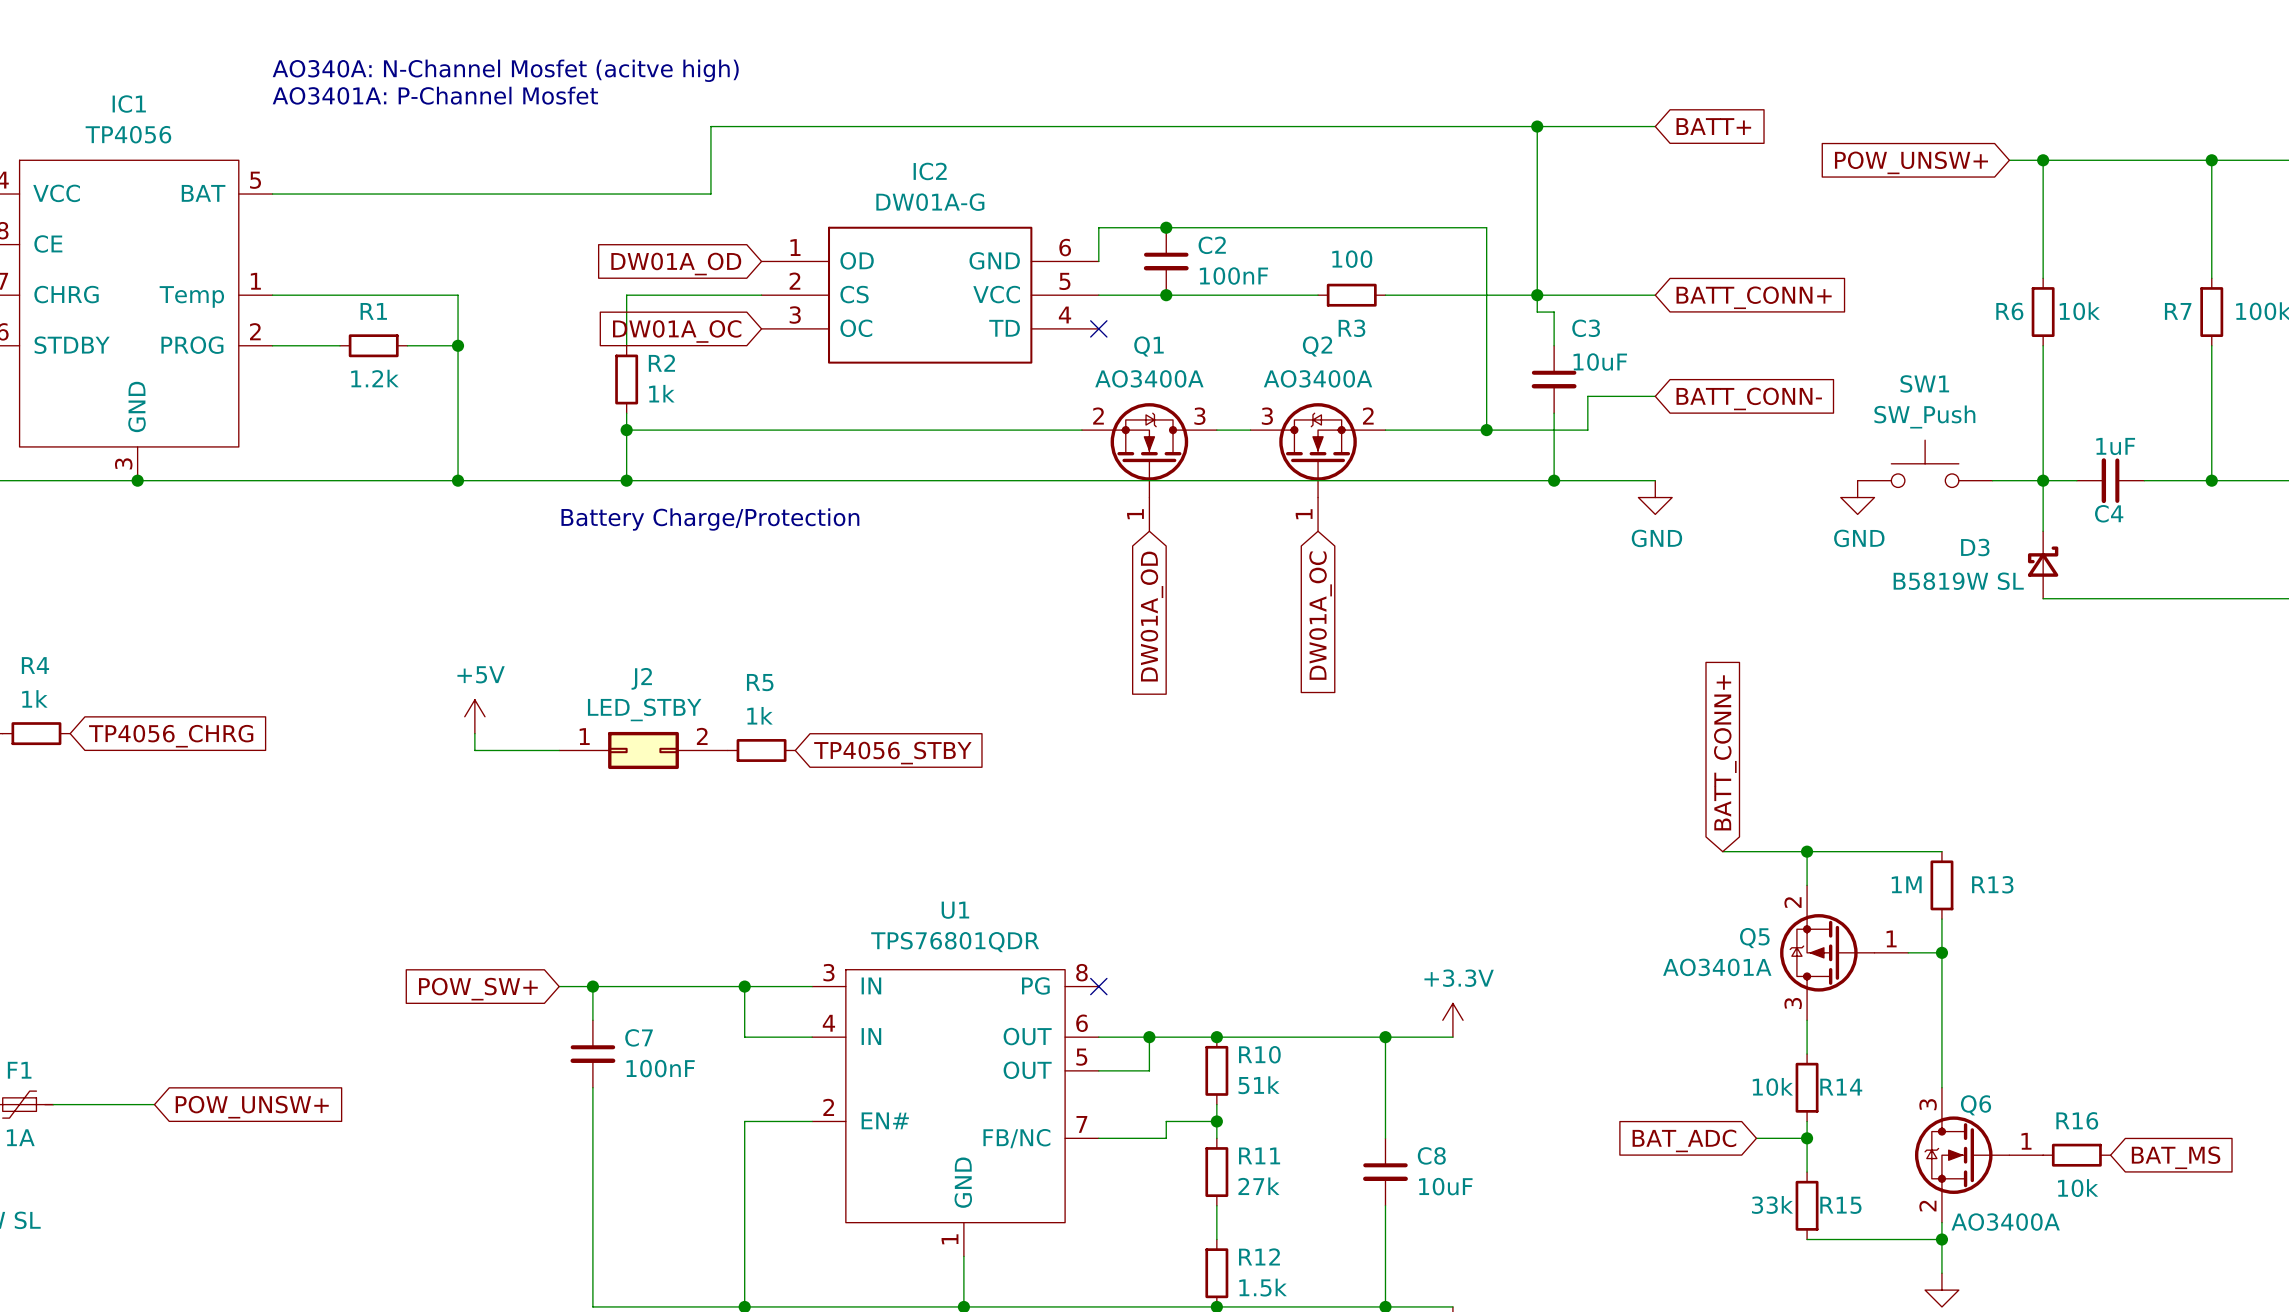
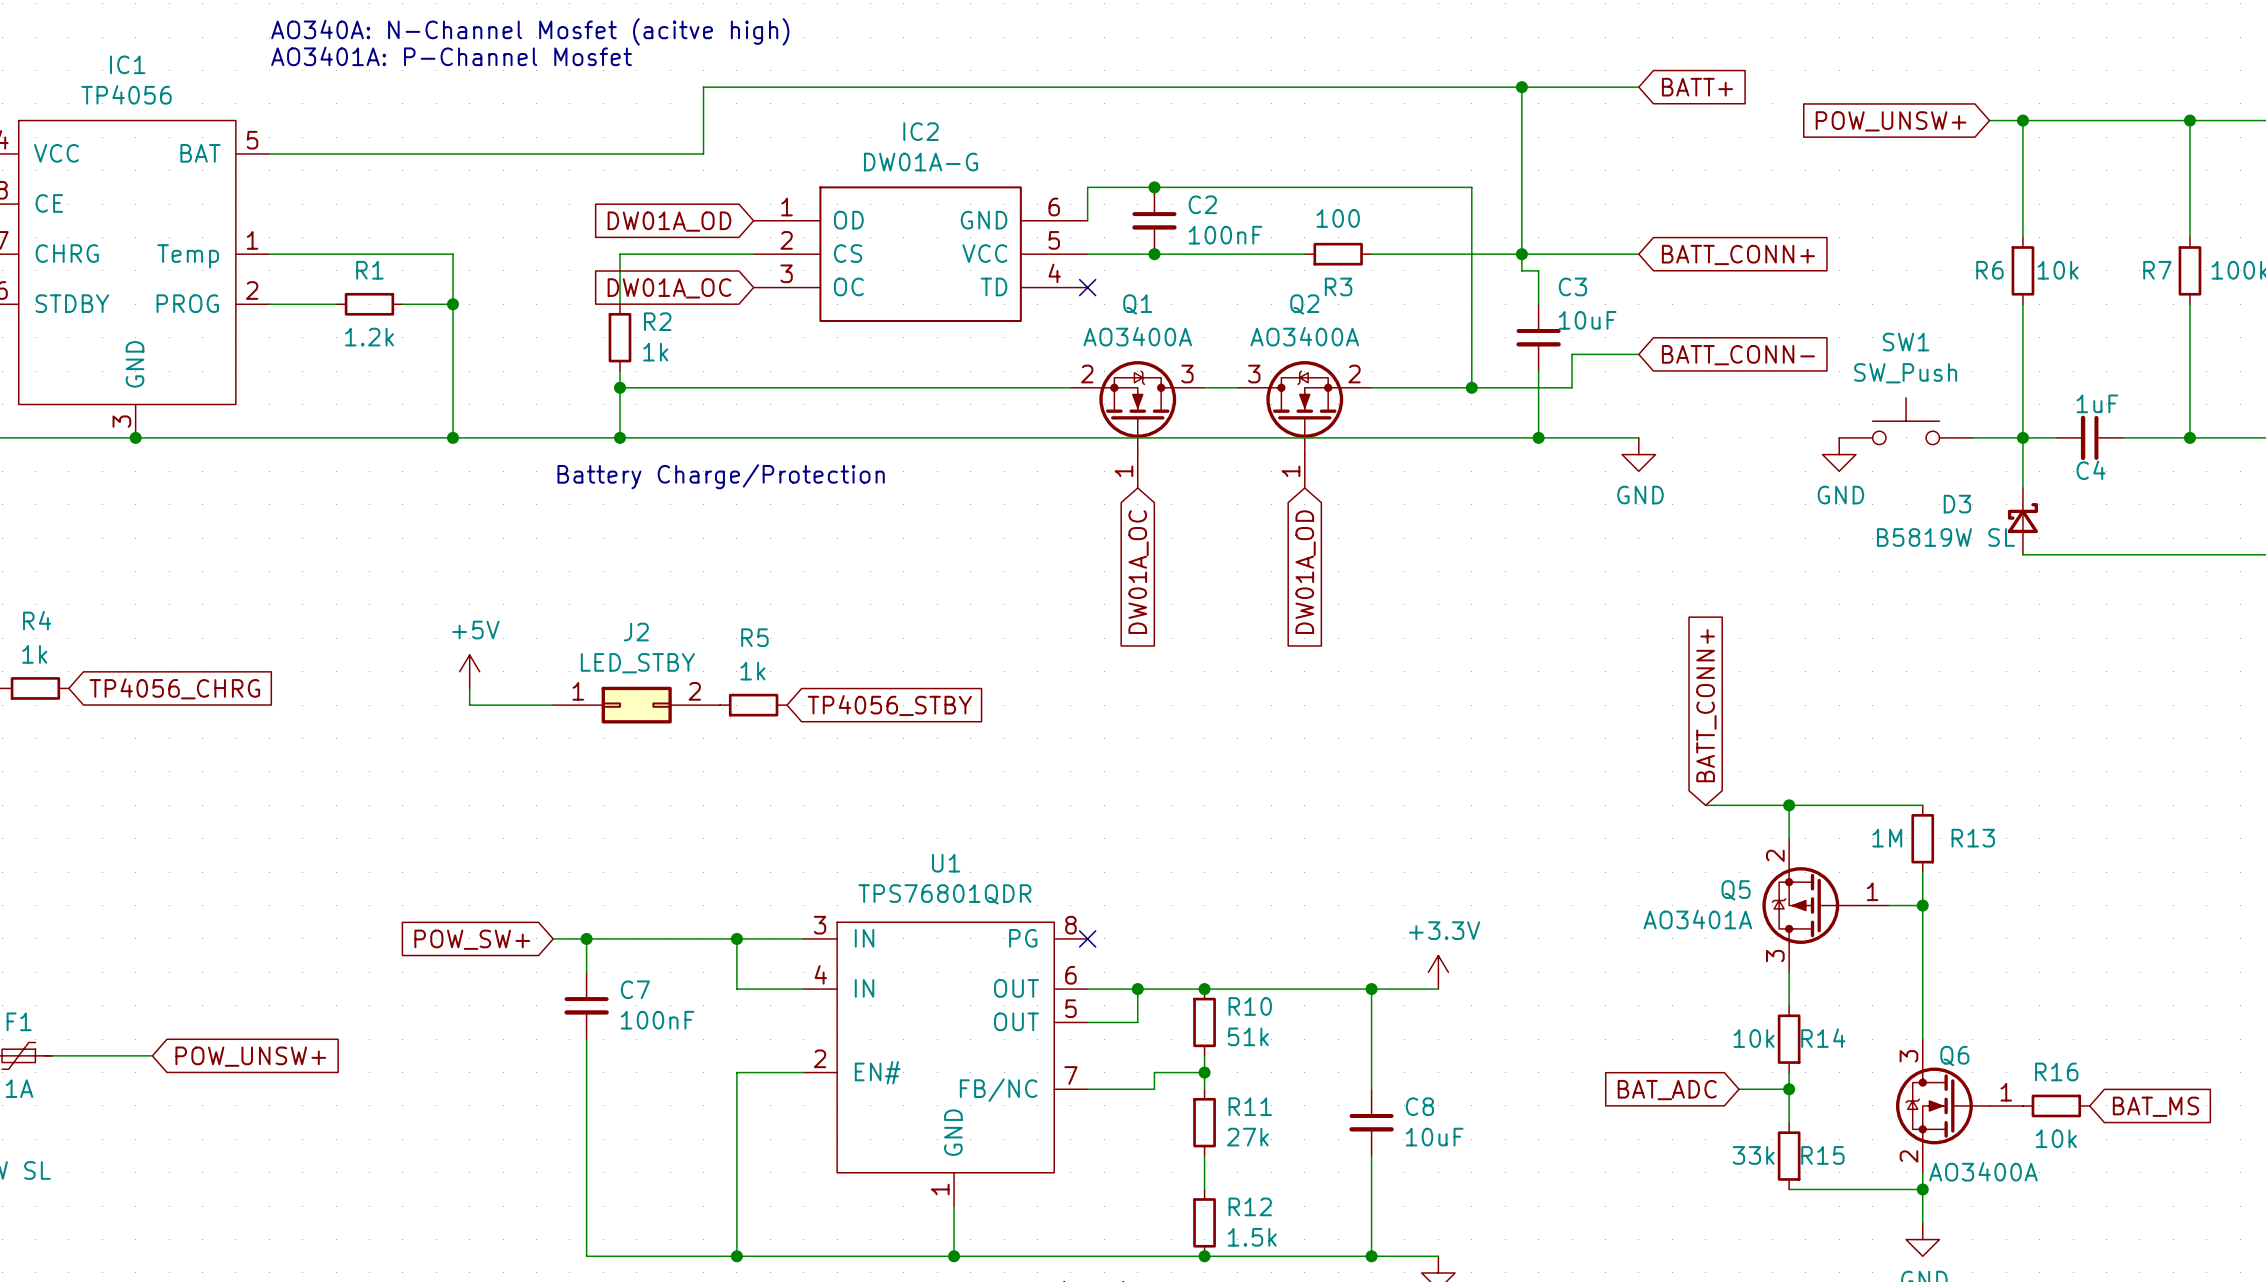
global label: DW01A_OC (1320, 615) -> DW01A_OD (1305, 572)
global label: DW01A_OD (1151, 616) -> DW01A_OC (1138, 572)

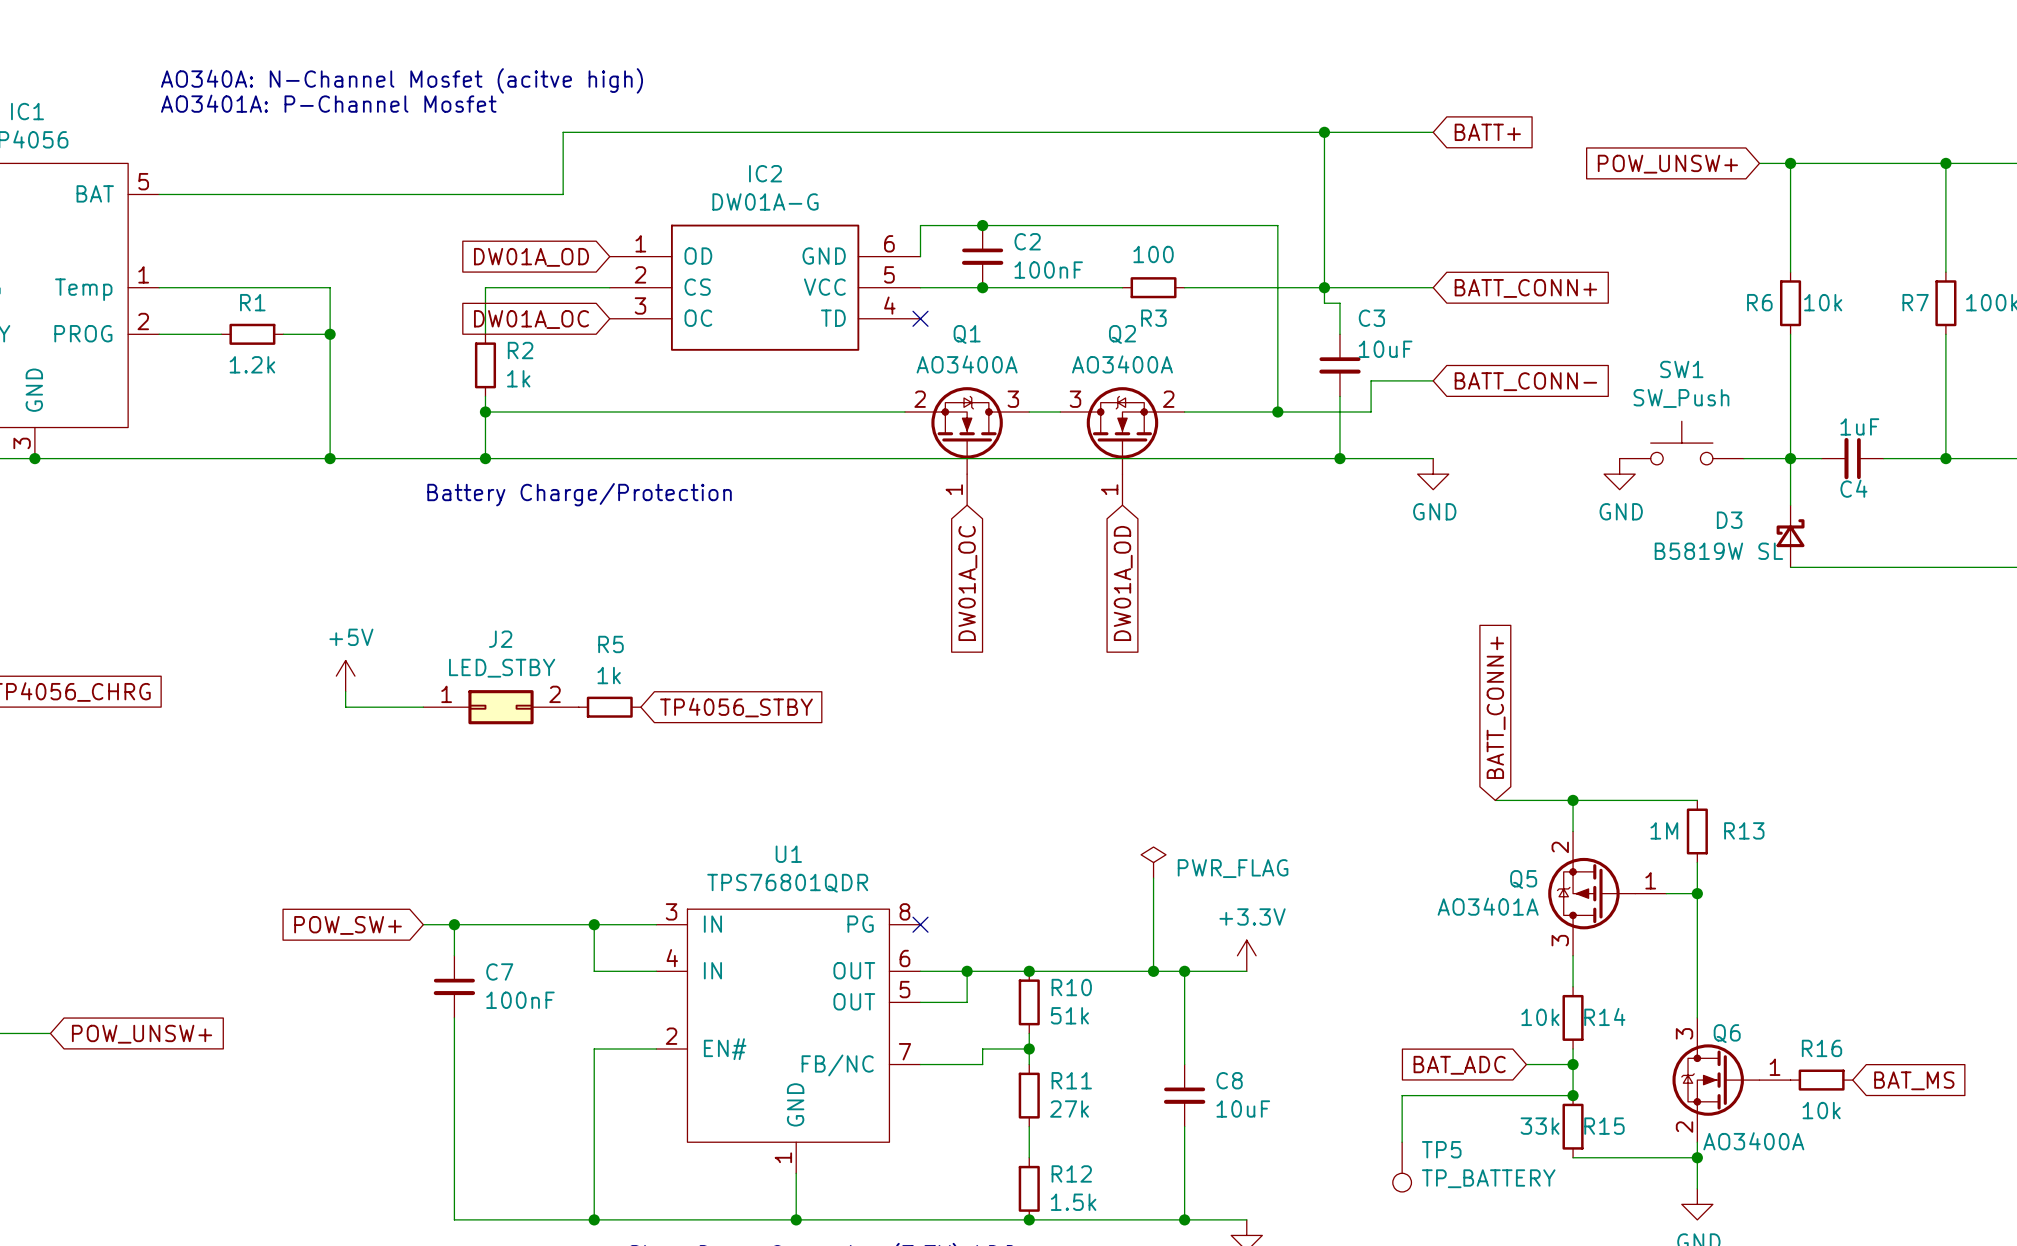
power symbol: none -> PWR_FLAG (1153, 862)
wire: none -> (1153, 878) (1153, 971)
junction: none -> (1153, 971)
wire: none -> (1573, 1095) (1402, 1095) (1402, 1142)
junction: none -> (1573, 1095)
TP5: none -> TP_BATTERY (1402, 1167)

